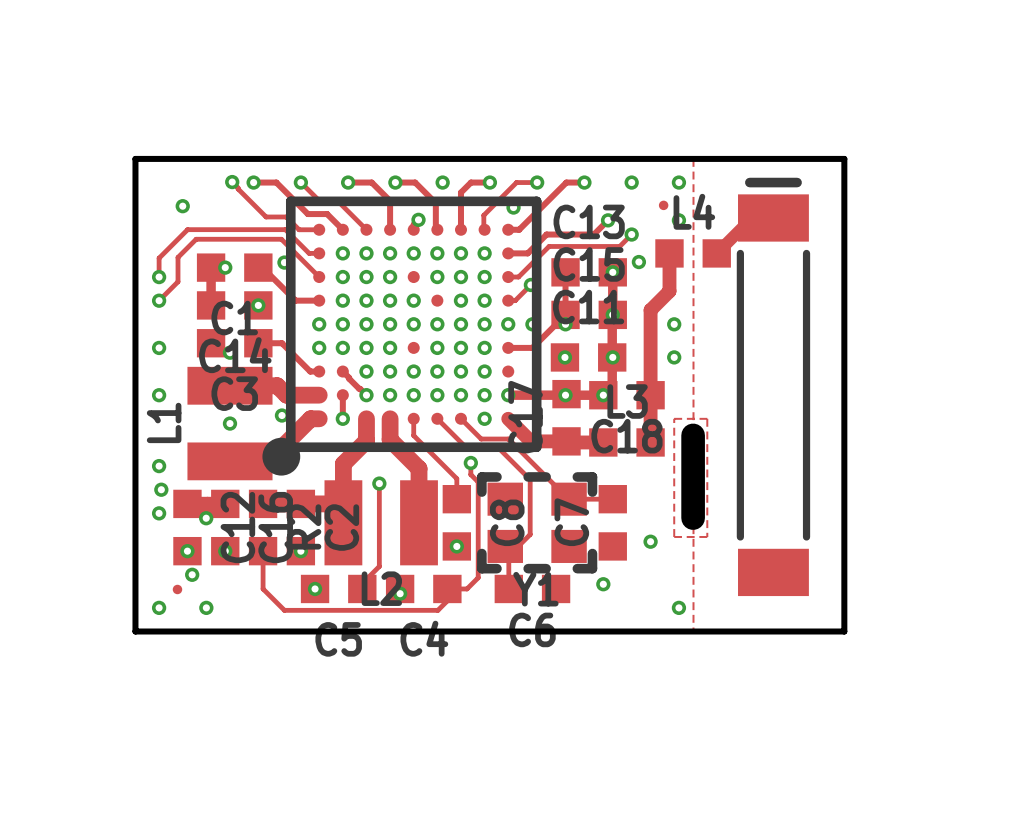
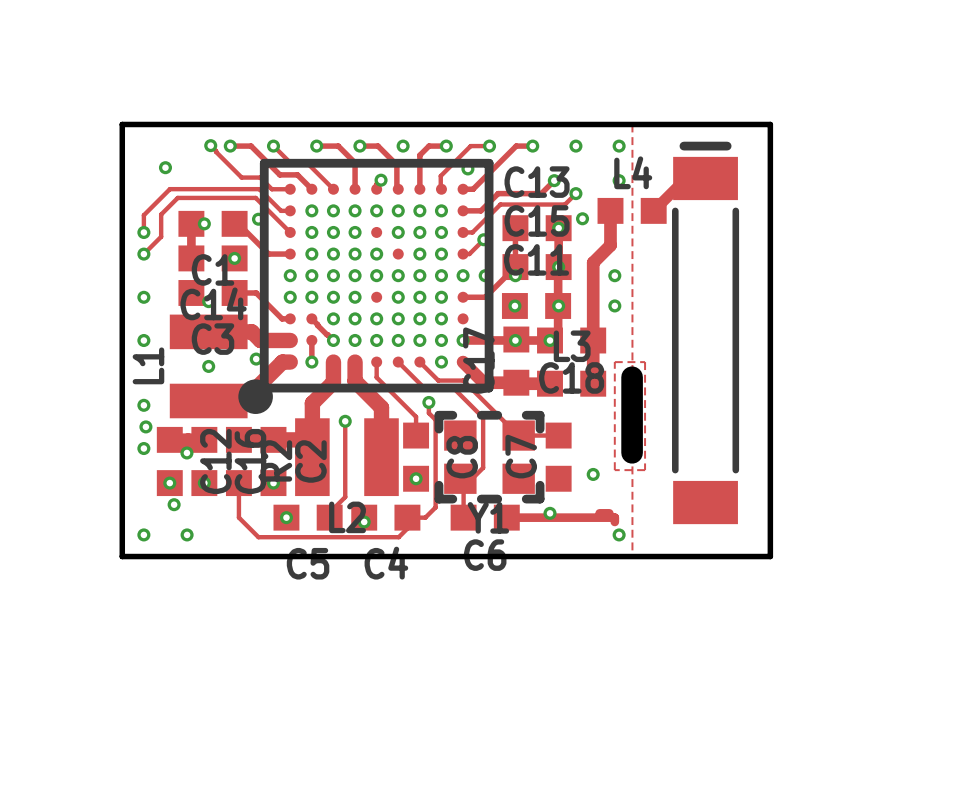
part: (663, 205) -> none
track: none -> (599, 513) (609, 513)
track: none -> (506, 517) (614, 517) (614, 521)
part: (177, 589) -> none

